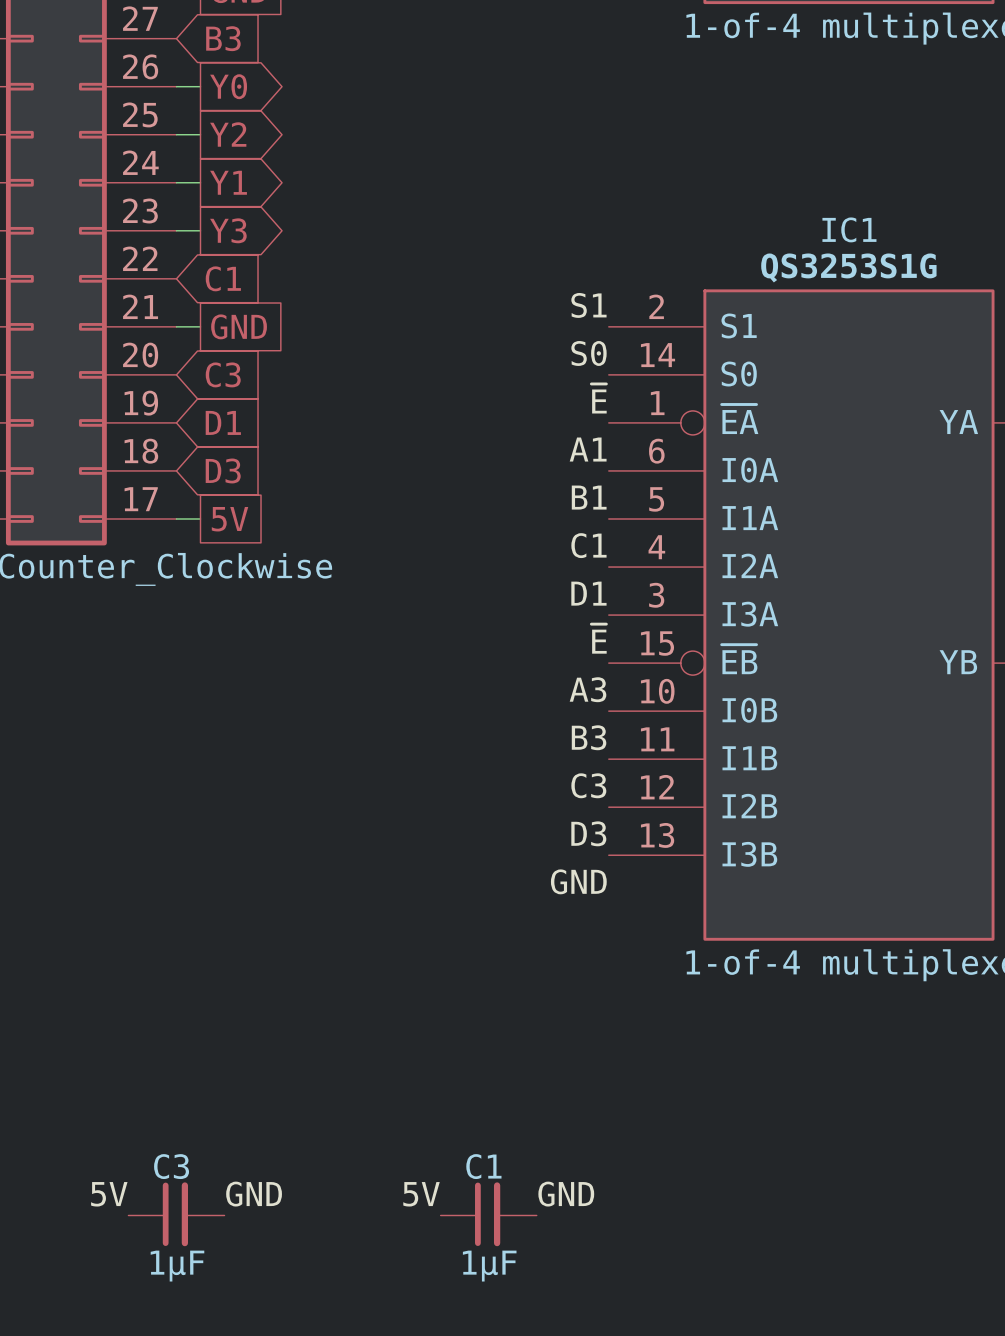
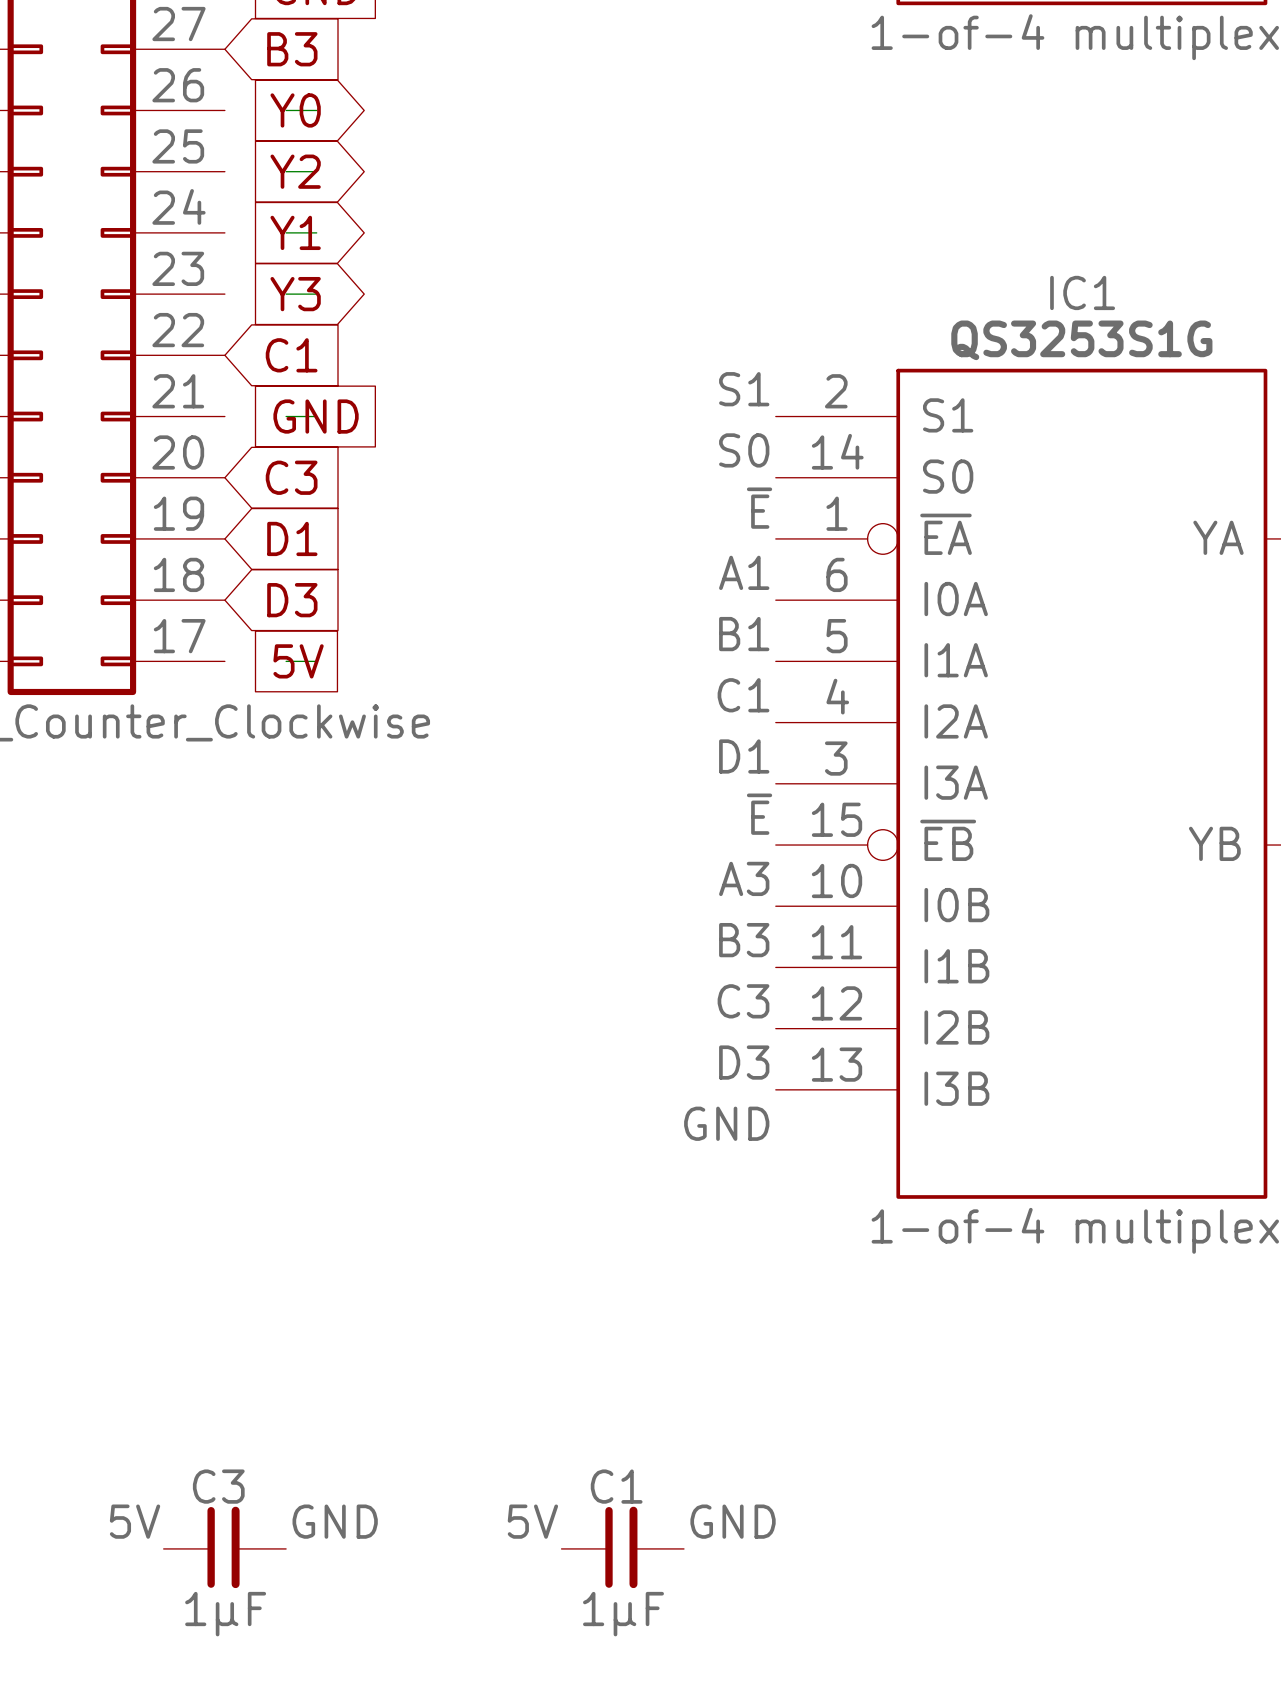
wire: (176, 86) (200, 86) -> (286, 110) (316, 110)
wire: (176, 134) (200, 134) -> (286, 171) (316, 171)
wire: (176, 182) (200, 182) -> (286, 232) (316, 232)
wire: (176, 230) (200, 230) -> (286, 294) (316, 294)
wire: (176, 326) (200, 326) -> (286, 416) (316, 416)
wire: (176, 518) (200, 518) -> (286, 661) (316, 661)

